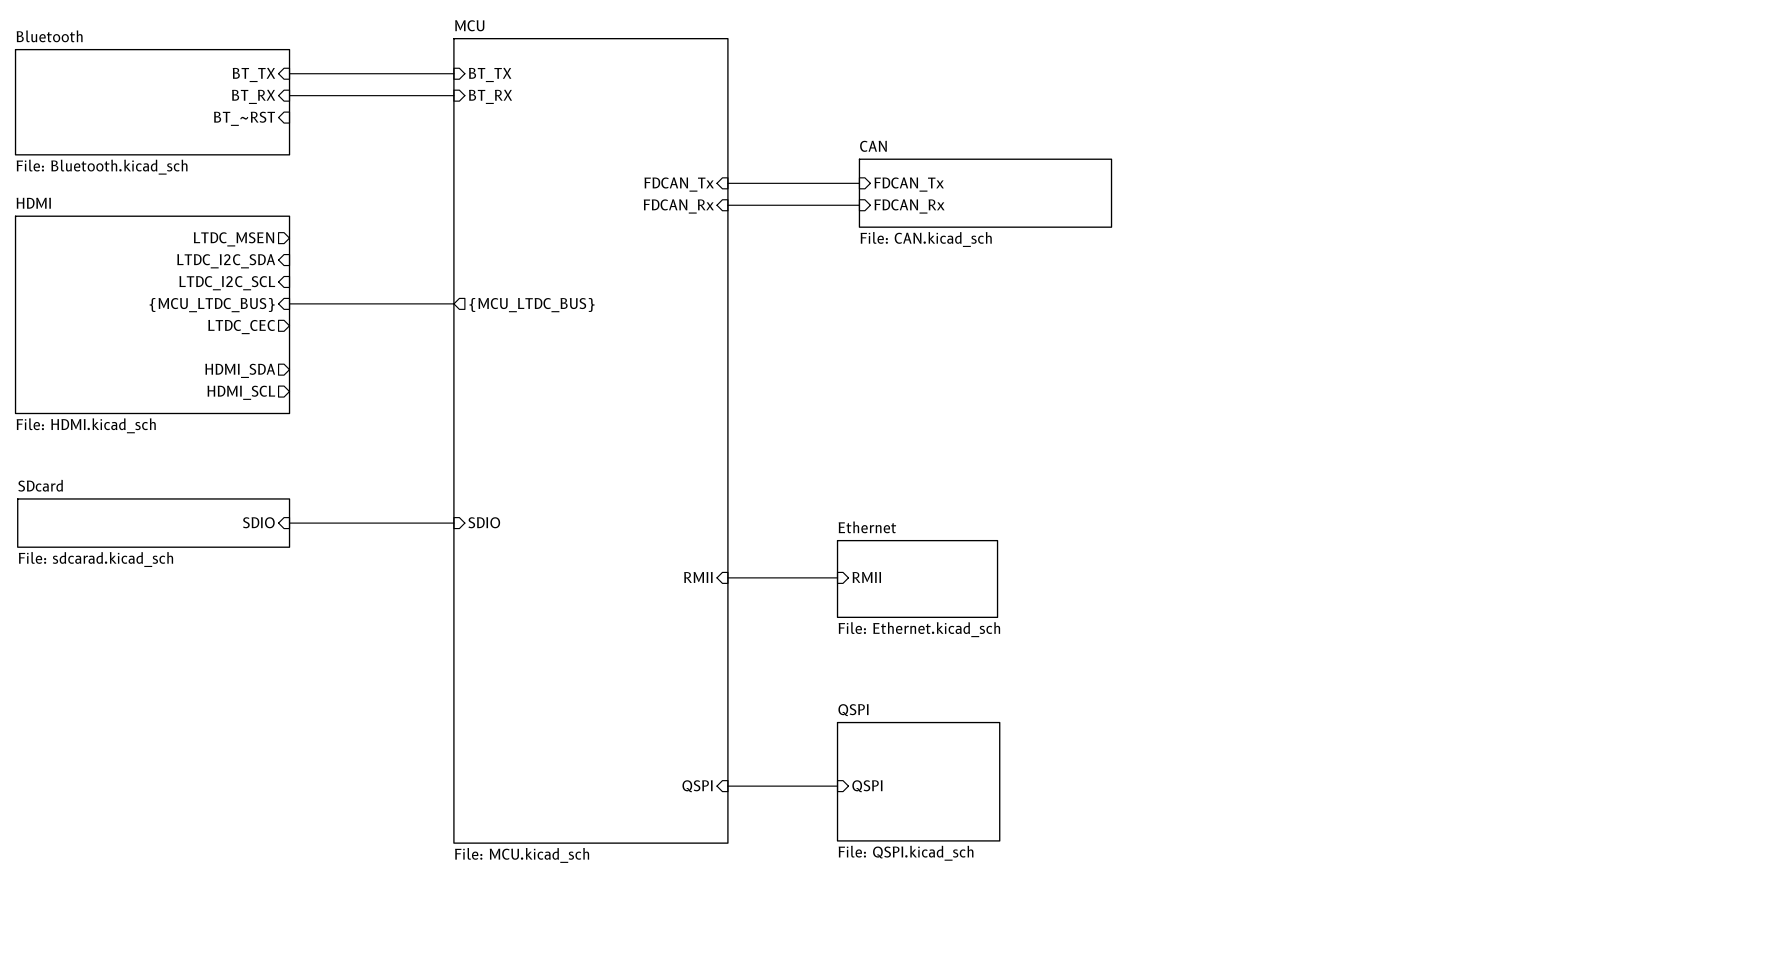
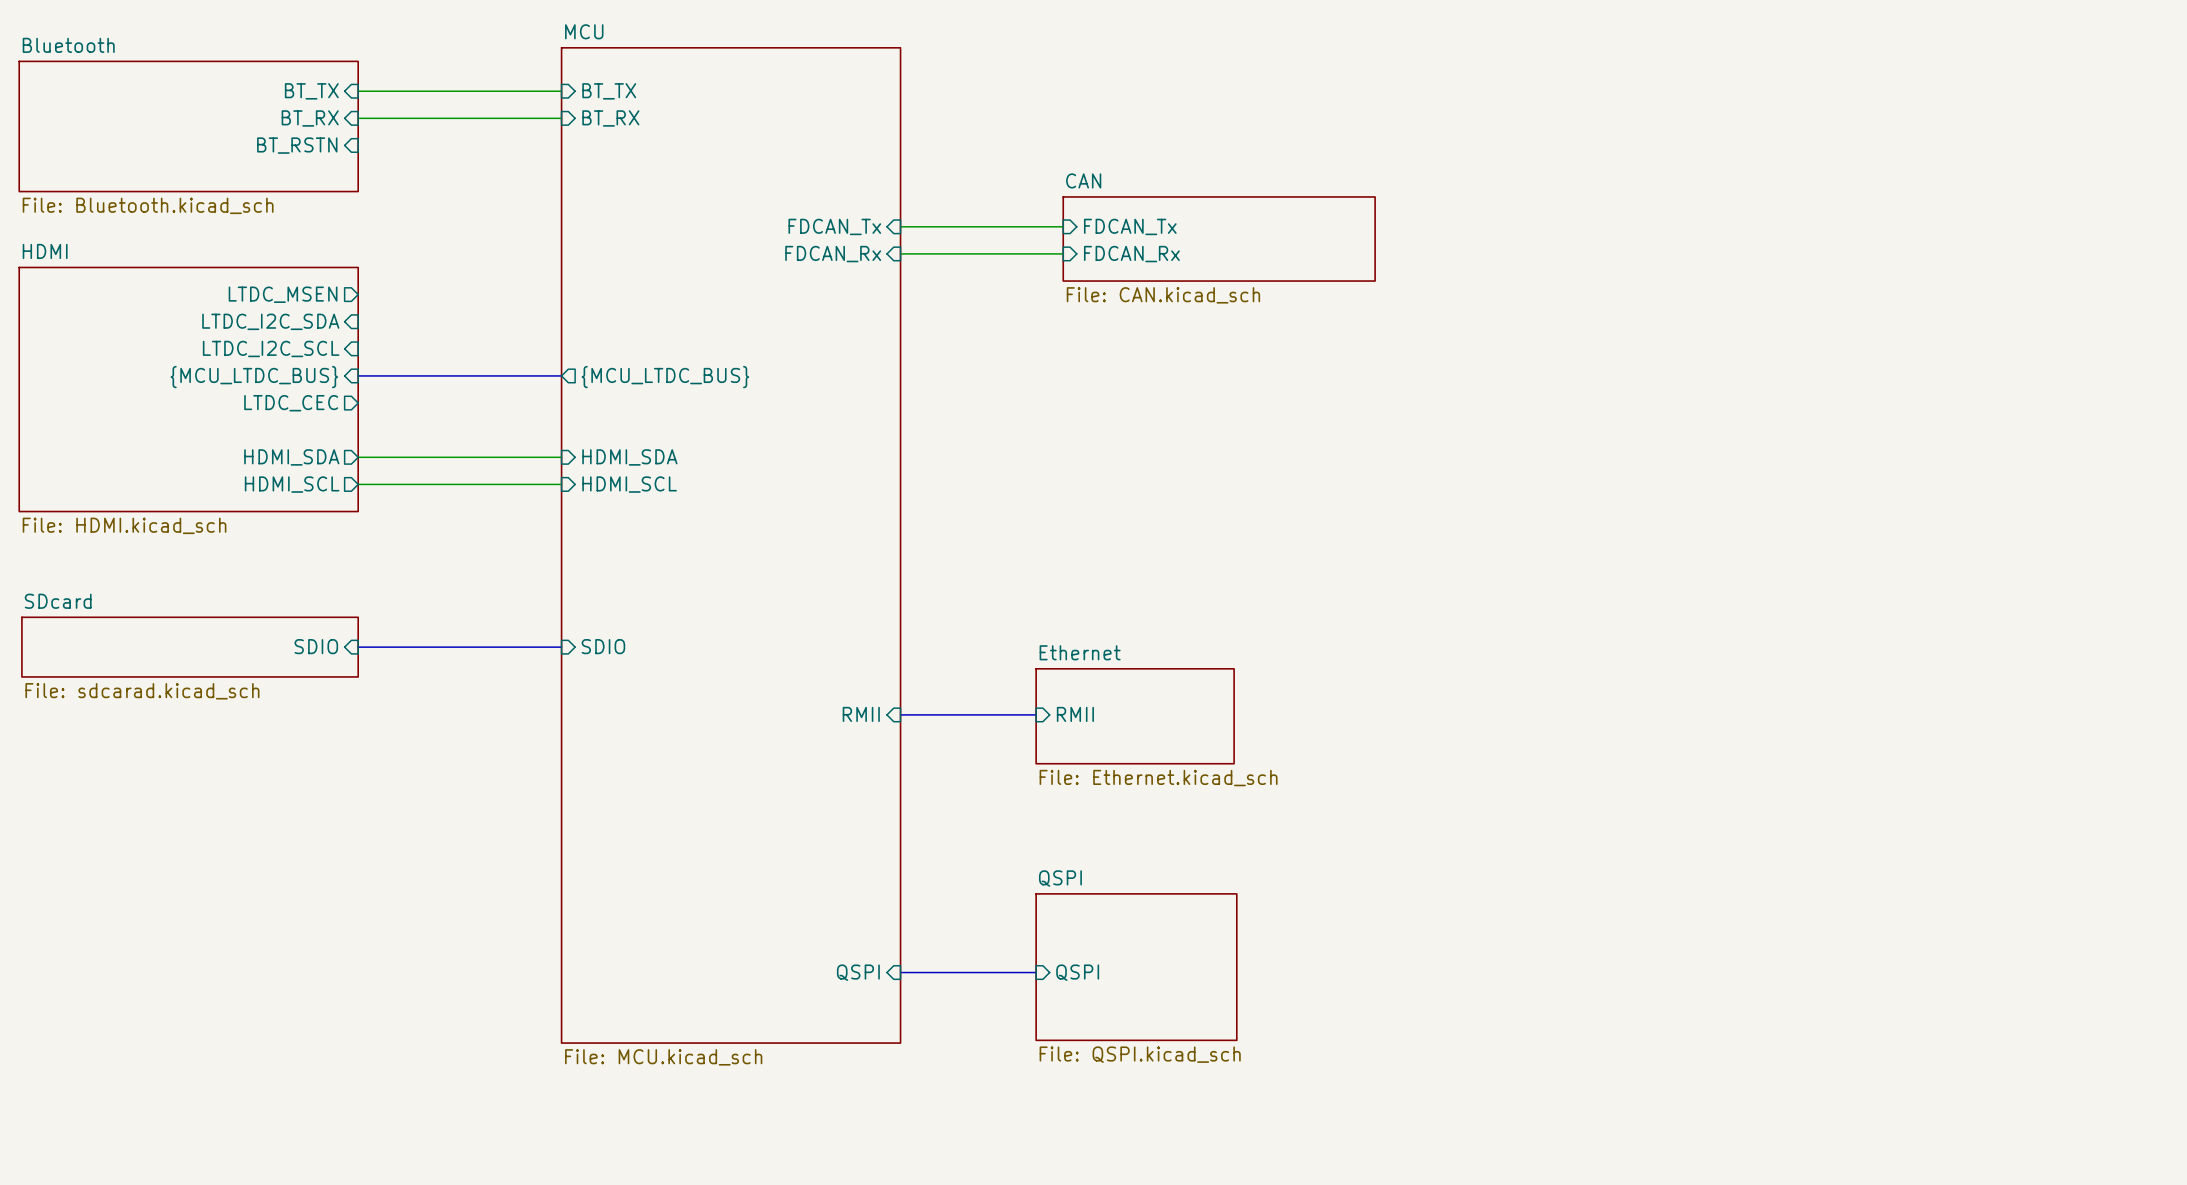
sheet pin: BT_~RST (244, 118) -> BT_RSTN (297, 145)
wire: none -> (358, 457) (561, 457)
sheet pin: none -> HDMI_SDA (629, 457)
wire: none -> (358, 484) (561, 484)
sheet pin: none -> HDMI_SCL (629, 484)

